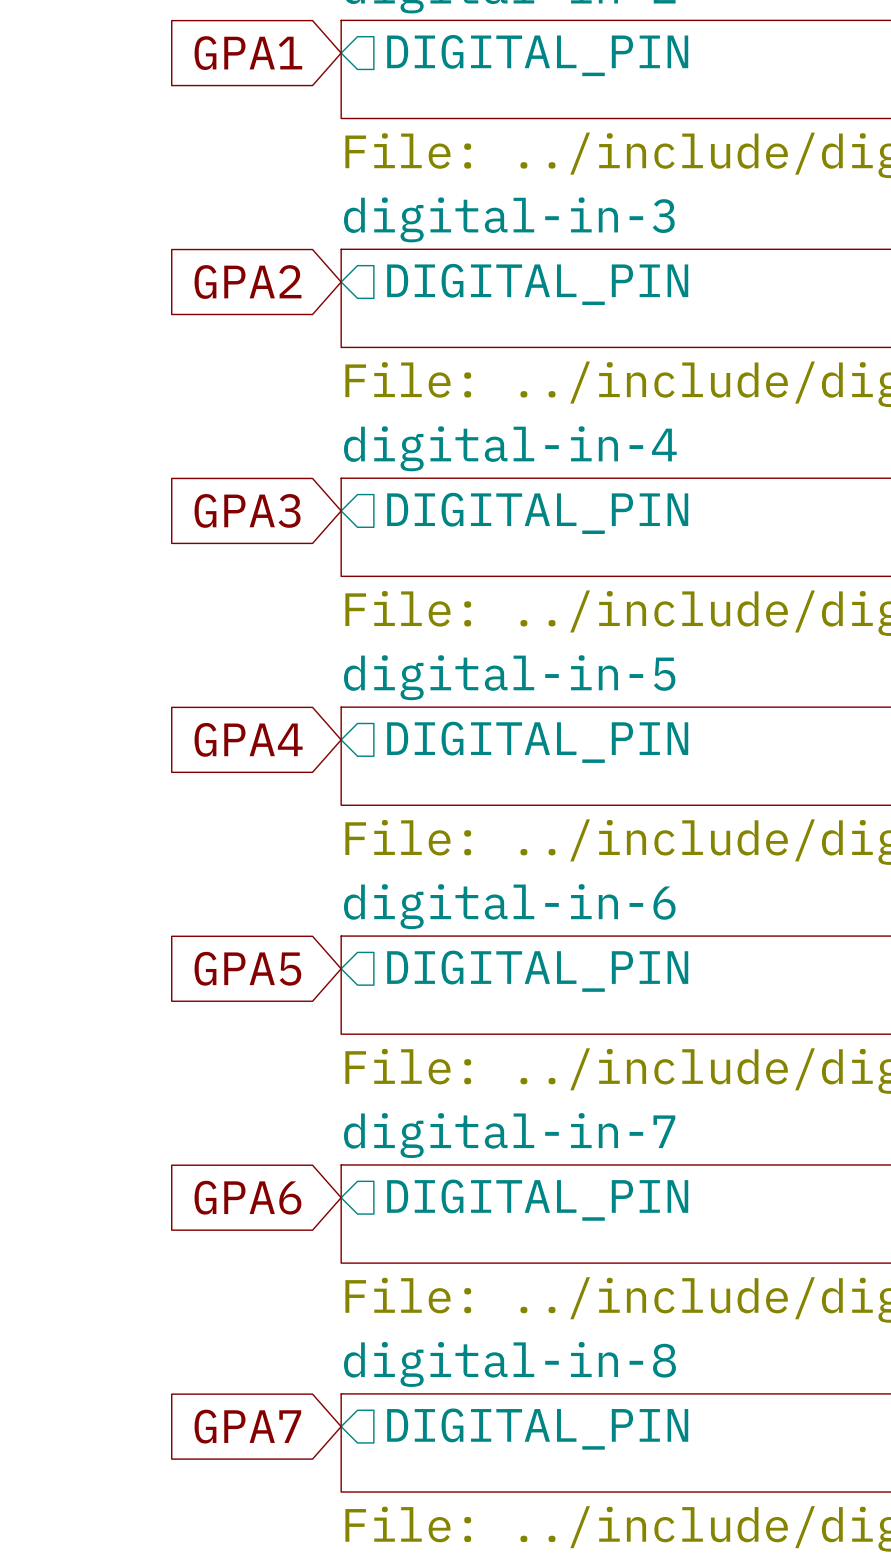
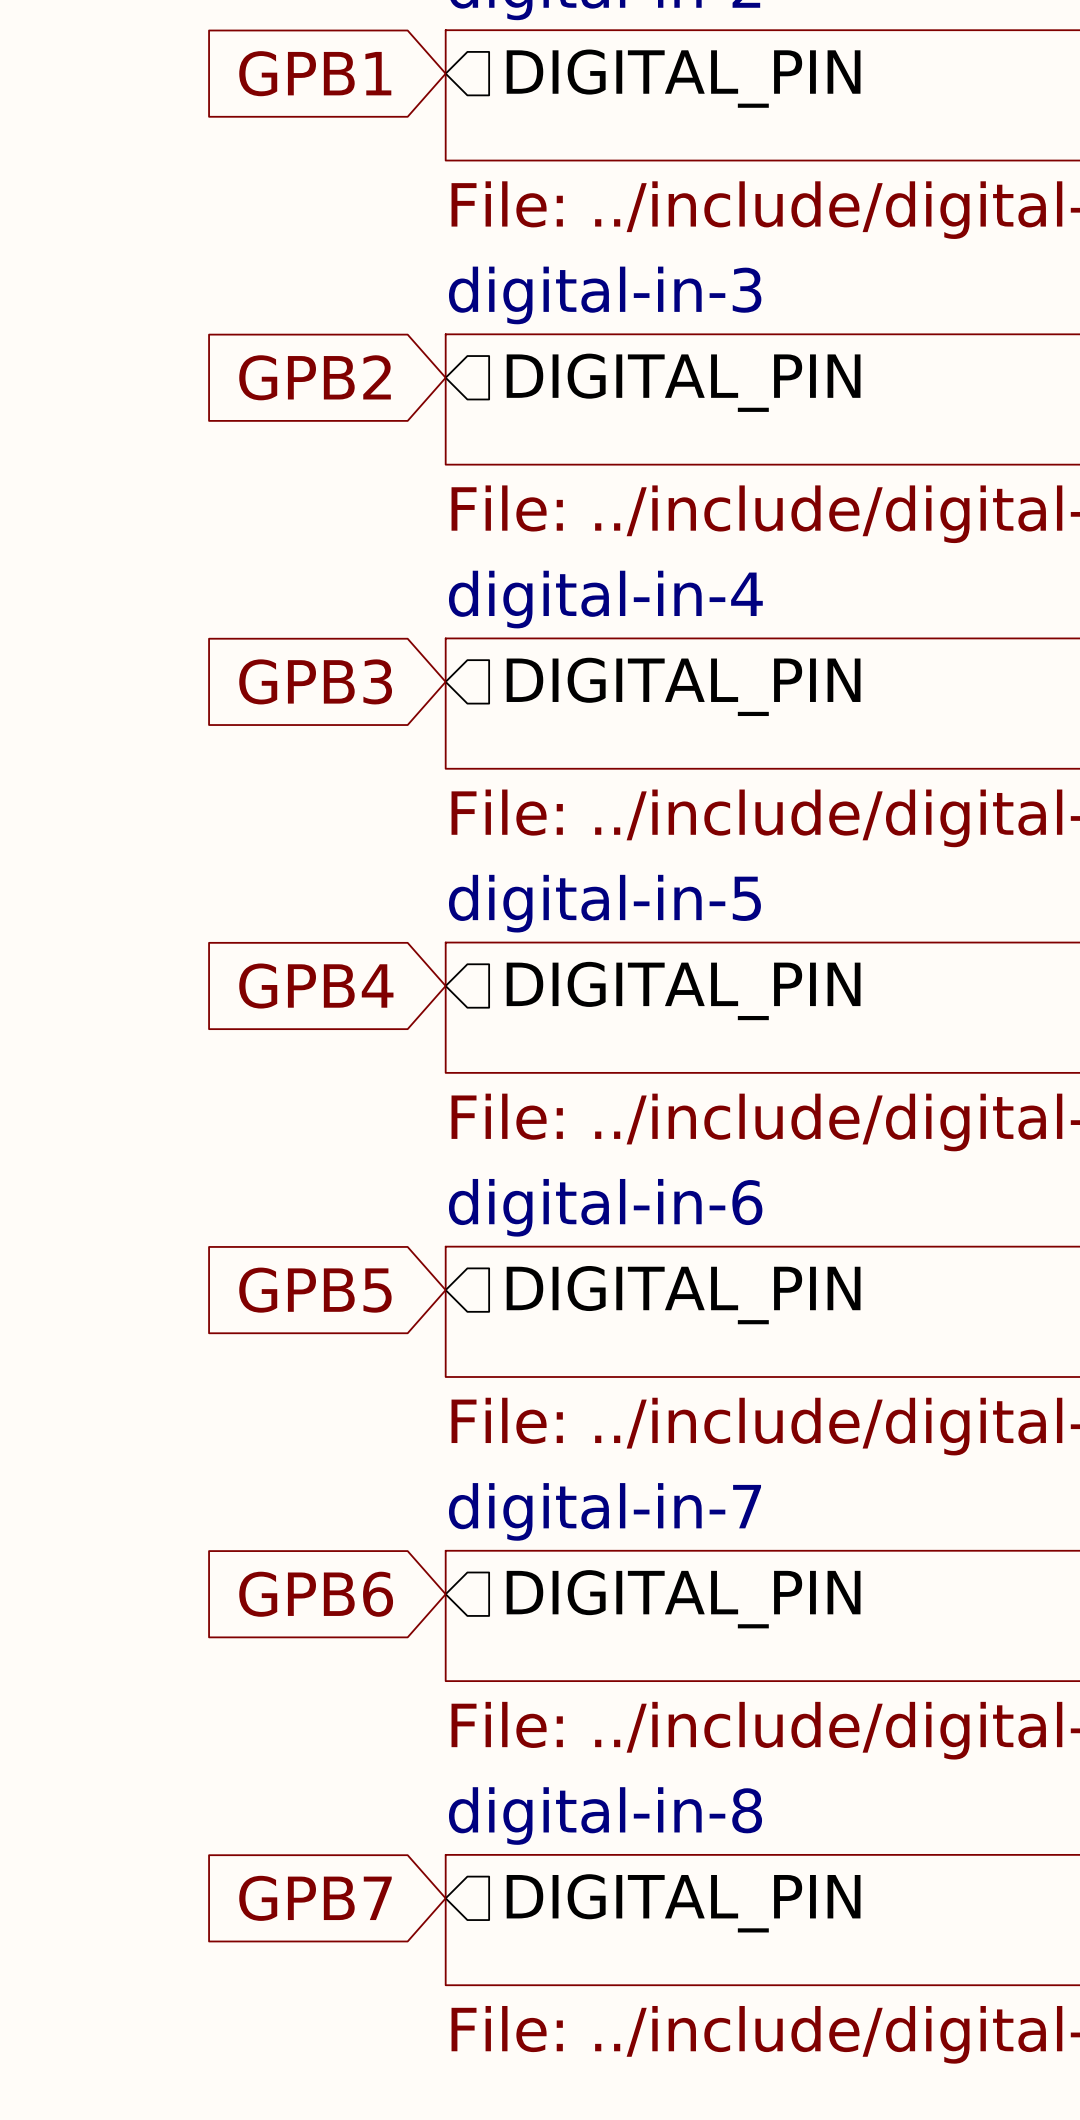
global label: GPA1 (248, 53) -> GPB1 (315, 73)
global label: GPA2 (247, 282) -> GPB2 (315, 377)
global label: GPA3 (247, 510) -> GPB3 (315, 681)
global label: GPA4 (248, 739) -> GPB4 (316, 986)
global label: GPA5 (247, 968) -> GPB5 (315, 1290)
global label: GPA6 (247, 1197) -> GPB6 (316, 1594)
global label: GPA7 (247, 1426) -> GPB7 (315, 1898)

